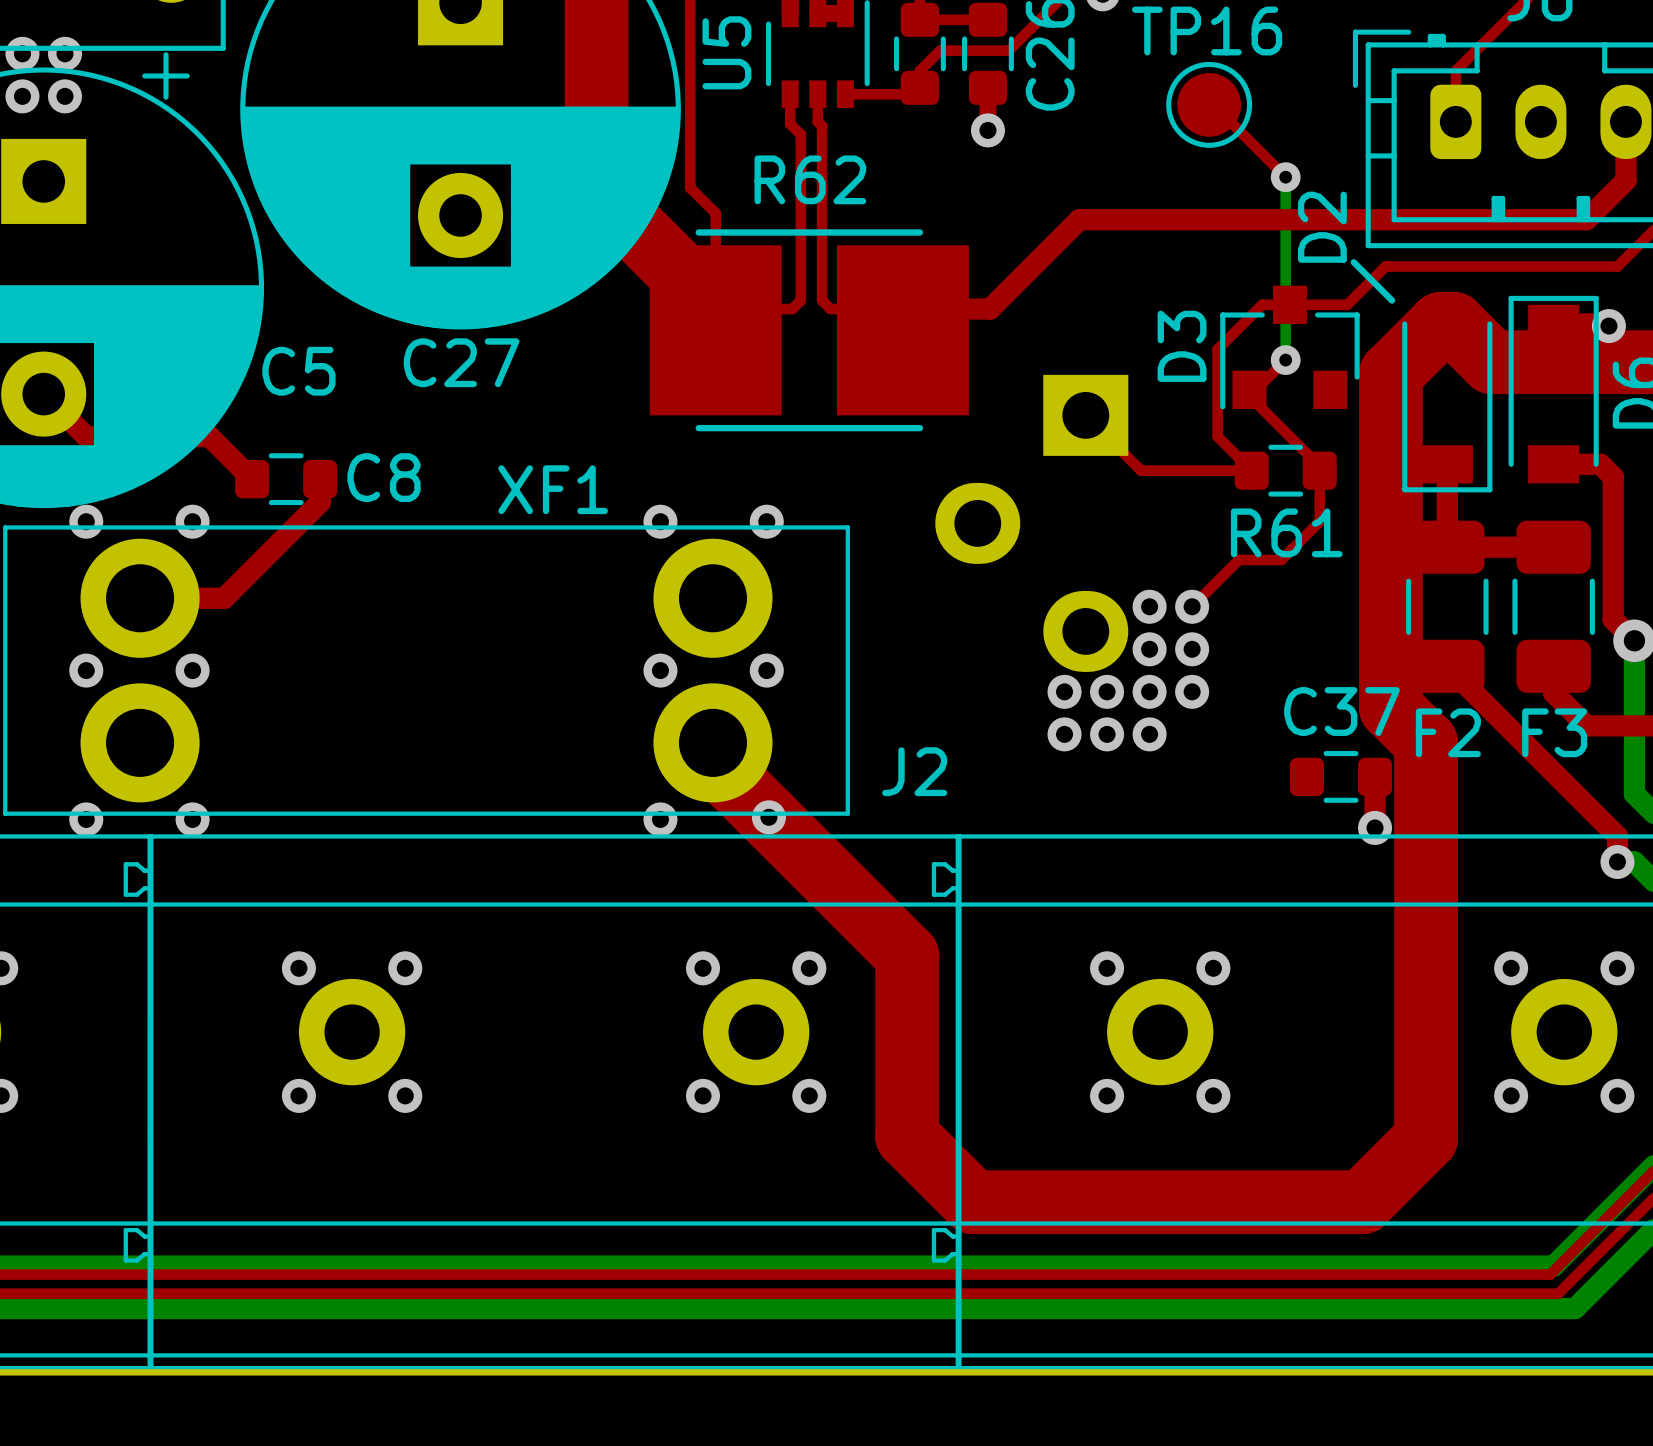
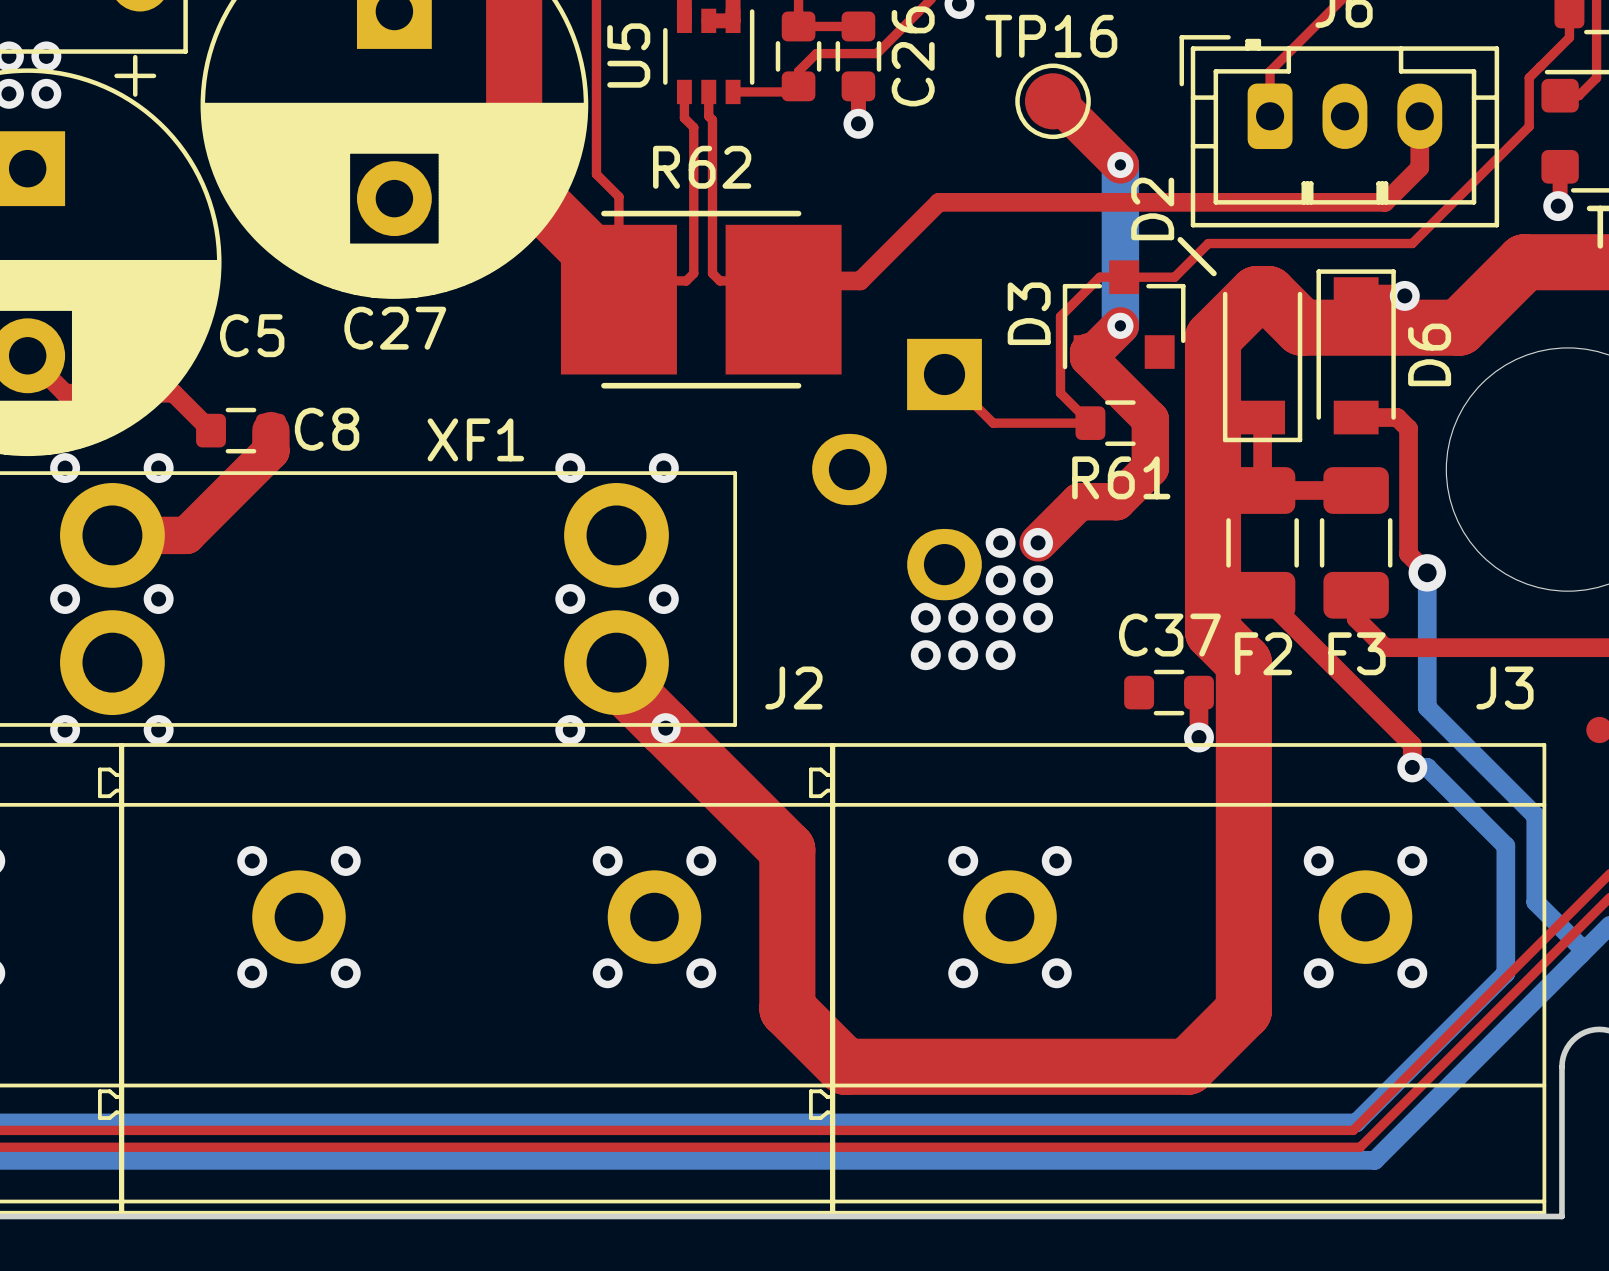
top track width: thin (1209, 104) (1213, 104) (1285, 177) -> thick (1053, 101) (1056, 101) (1120, 164)
bottom track width: thin (1285, 177) (1285, 360) -> thick (1120, 164) (1120, 325)
top track width: thin (1285, 360) (1255, 389) (1249, 389) (1249, 396) (1319, 466) (1319, 521) (1281, 559) (1238, 559) (1192, 606) -> thick (1120, 325) (1094, 352) (1088, 352) (1088, 357) (1150, 419) (1150, 468) (1116, 501) (1079, 501) (1038, 542)
top track width: thin (320, 479) (320, 502) (224, 598) (140, 598) -> thick (270, 430) (270, 451) (186, 535) (112, 535)

